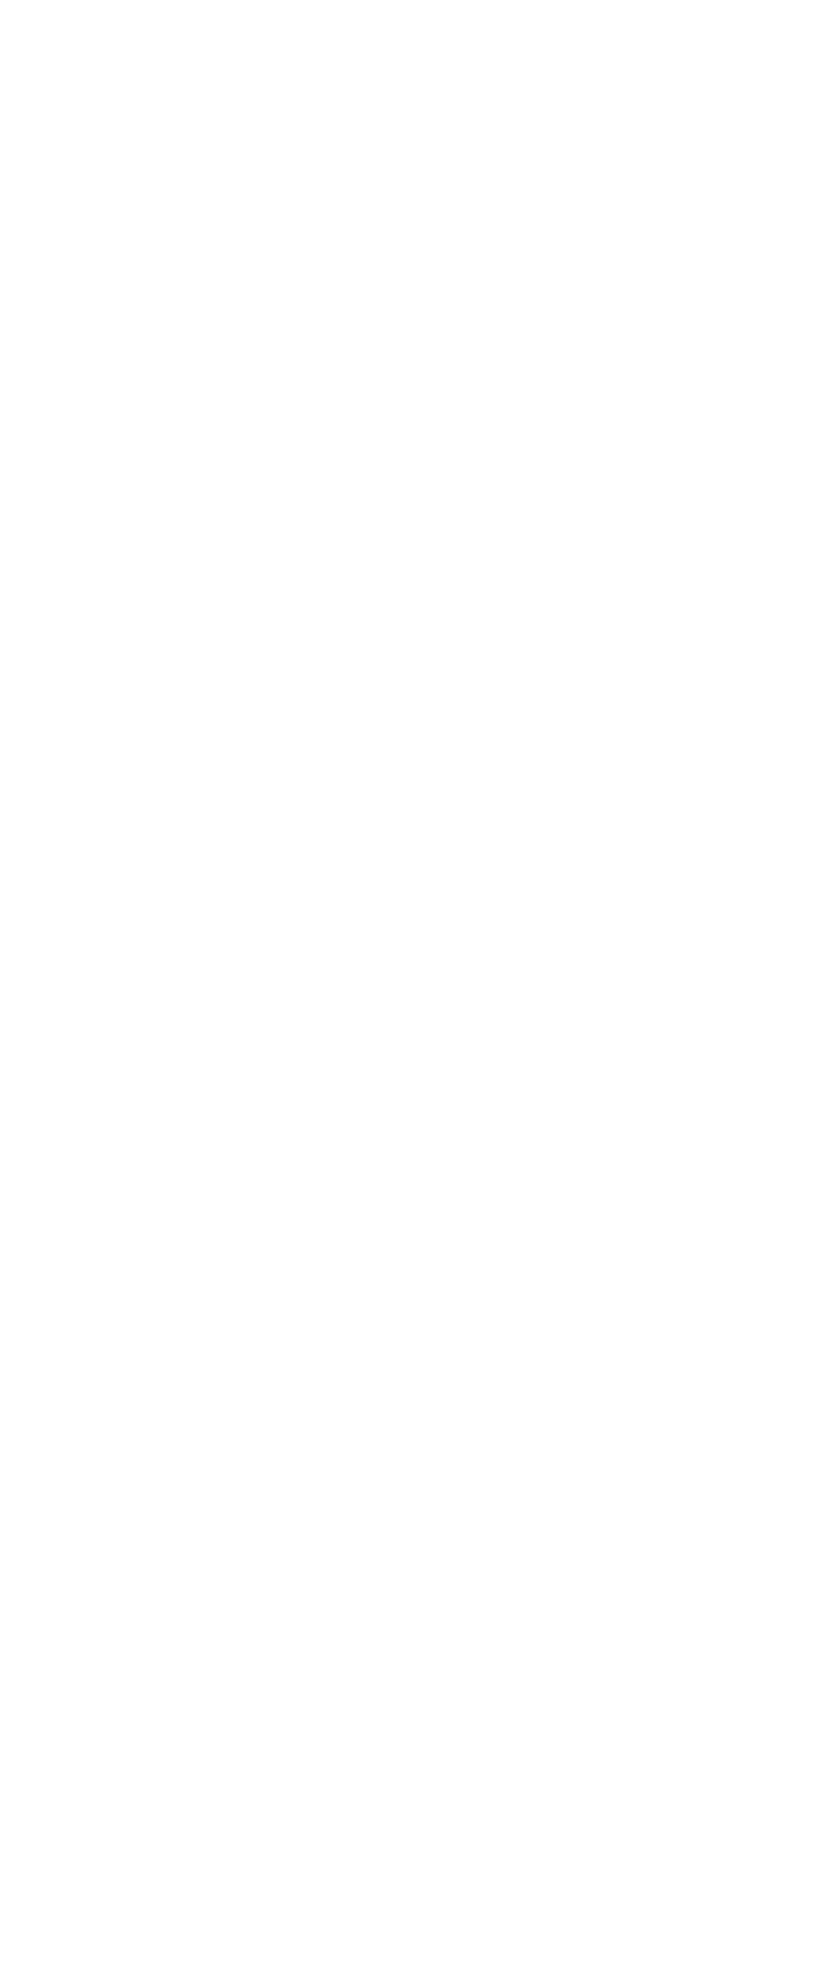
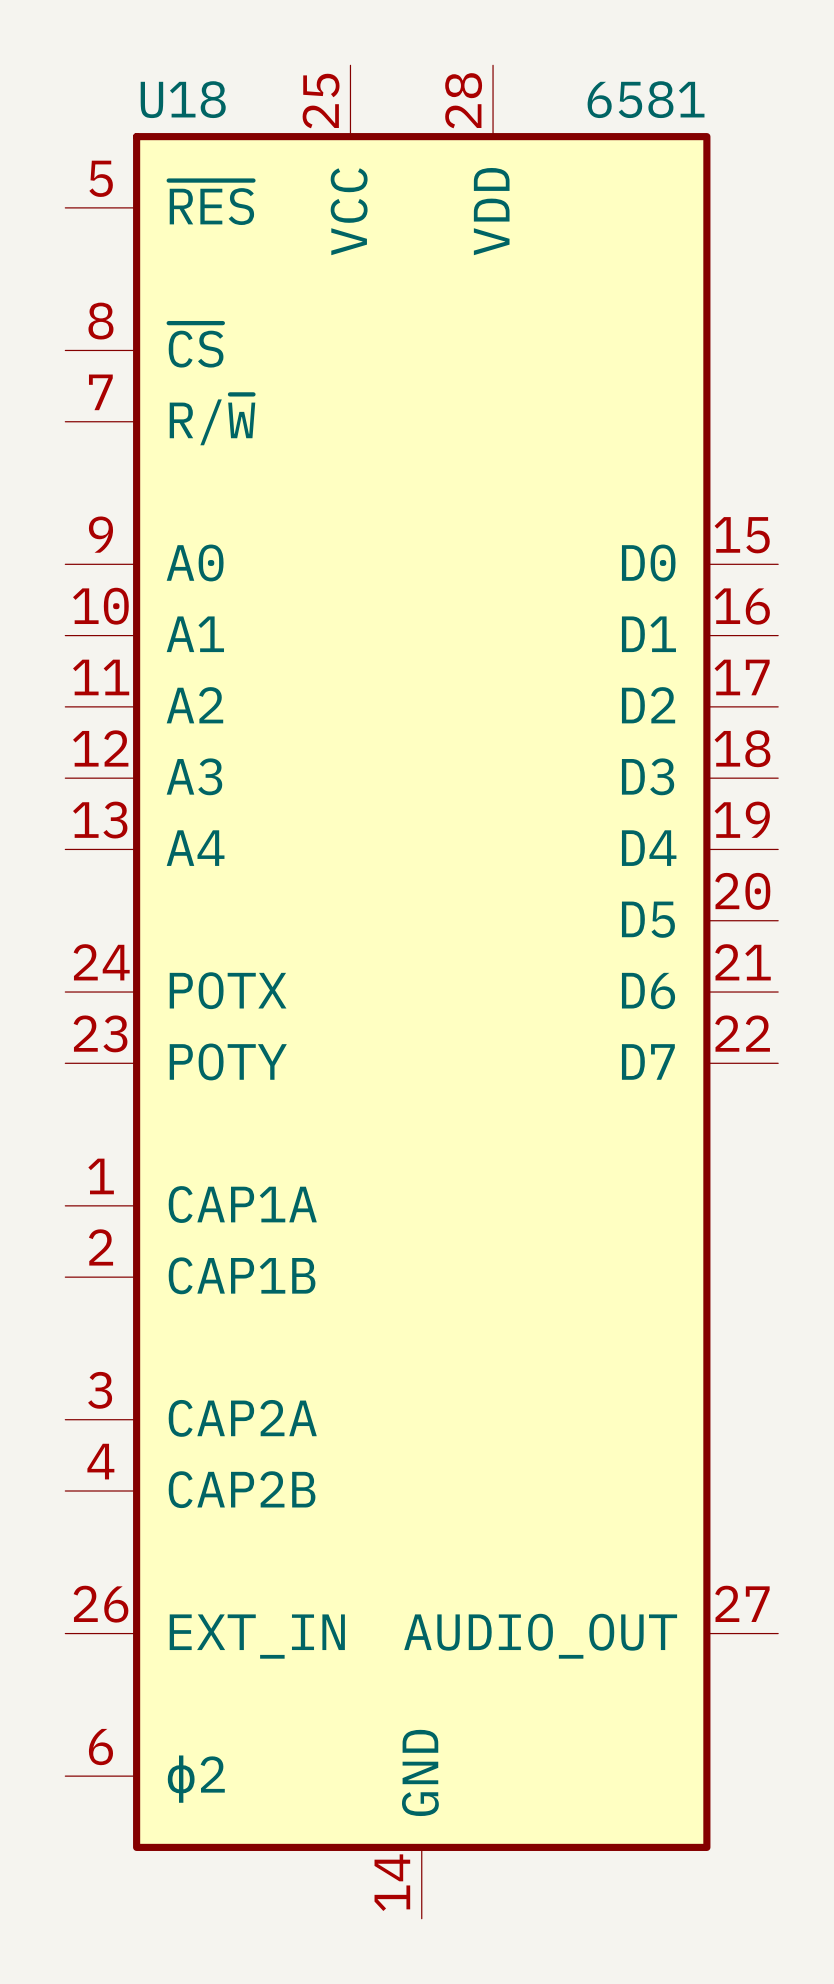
U18: none -> 6581 (421, 992)

